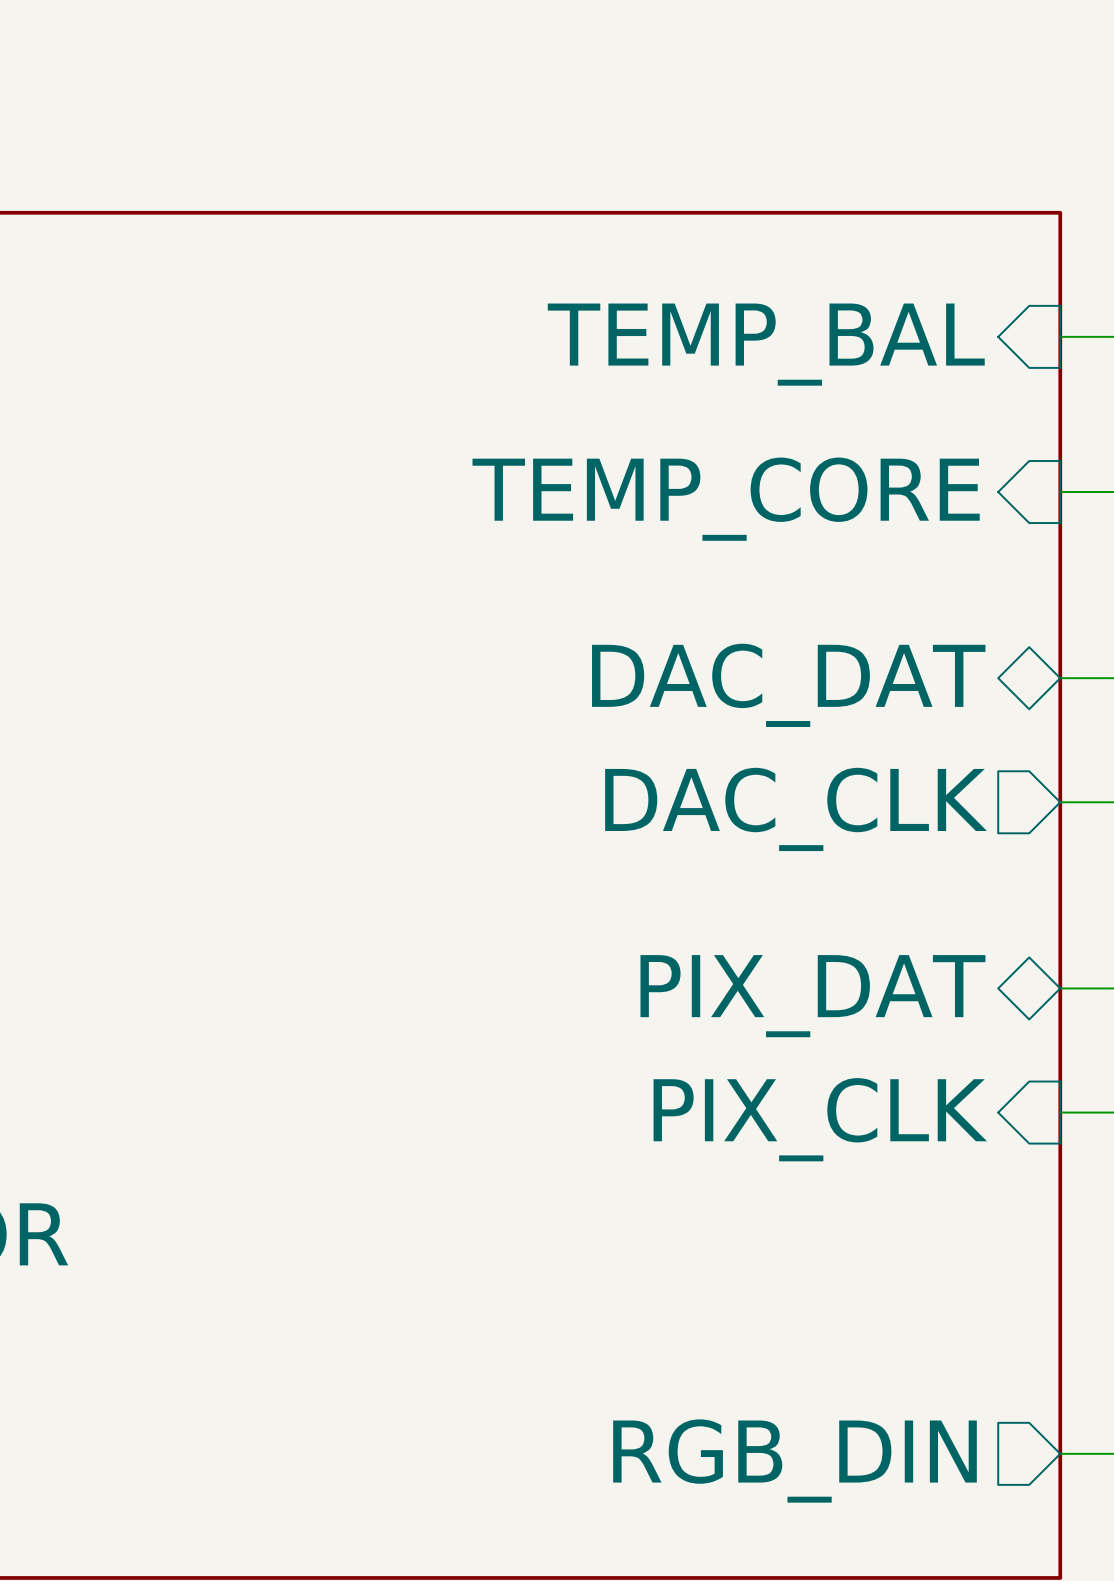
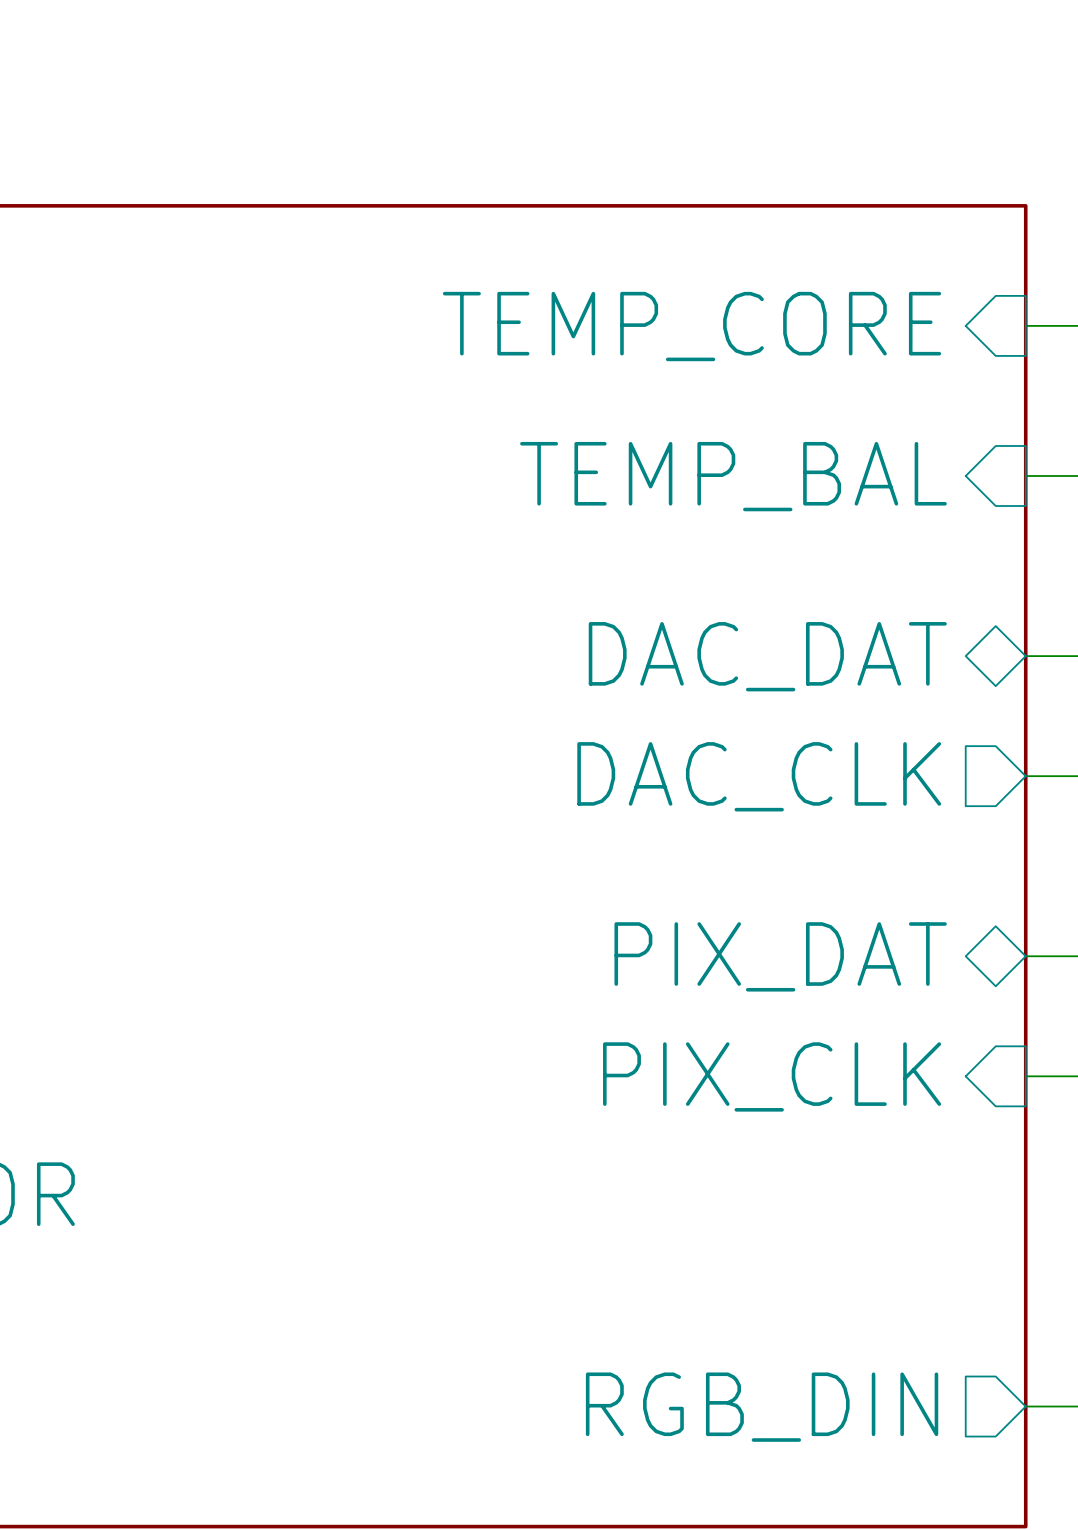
sheet pin: TEMP_BAL (766, 344) -> TEMP_CORE (692, 326)
sheet pin: TEMP_CORE (726, 499) -> TEMP_BAL (733, 476)

